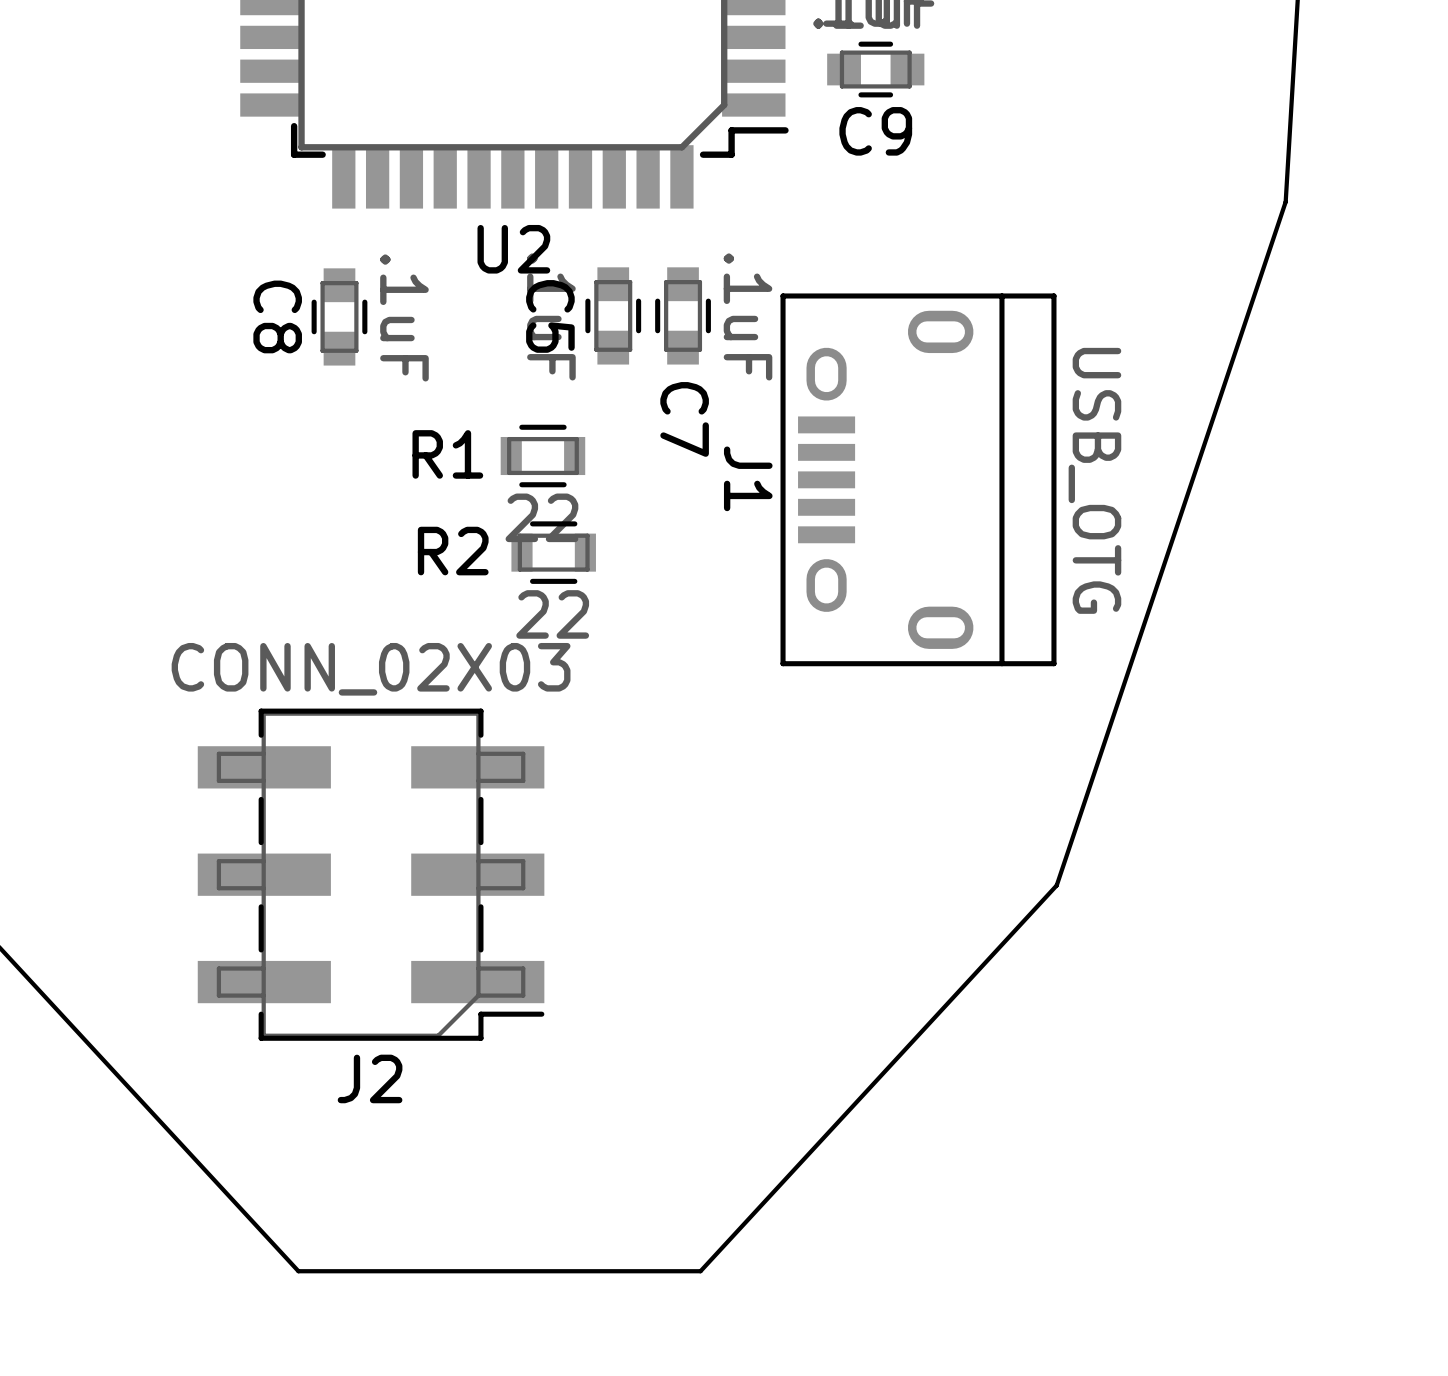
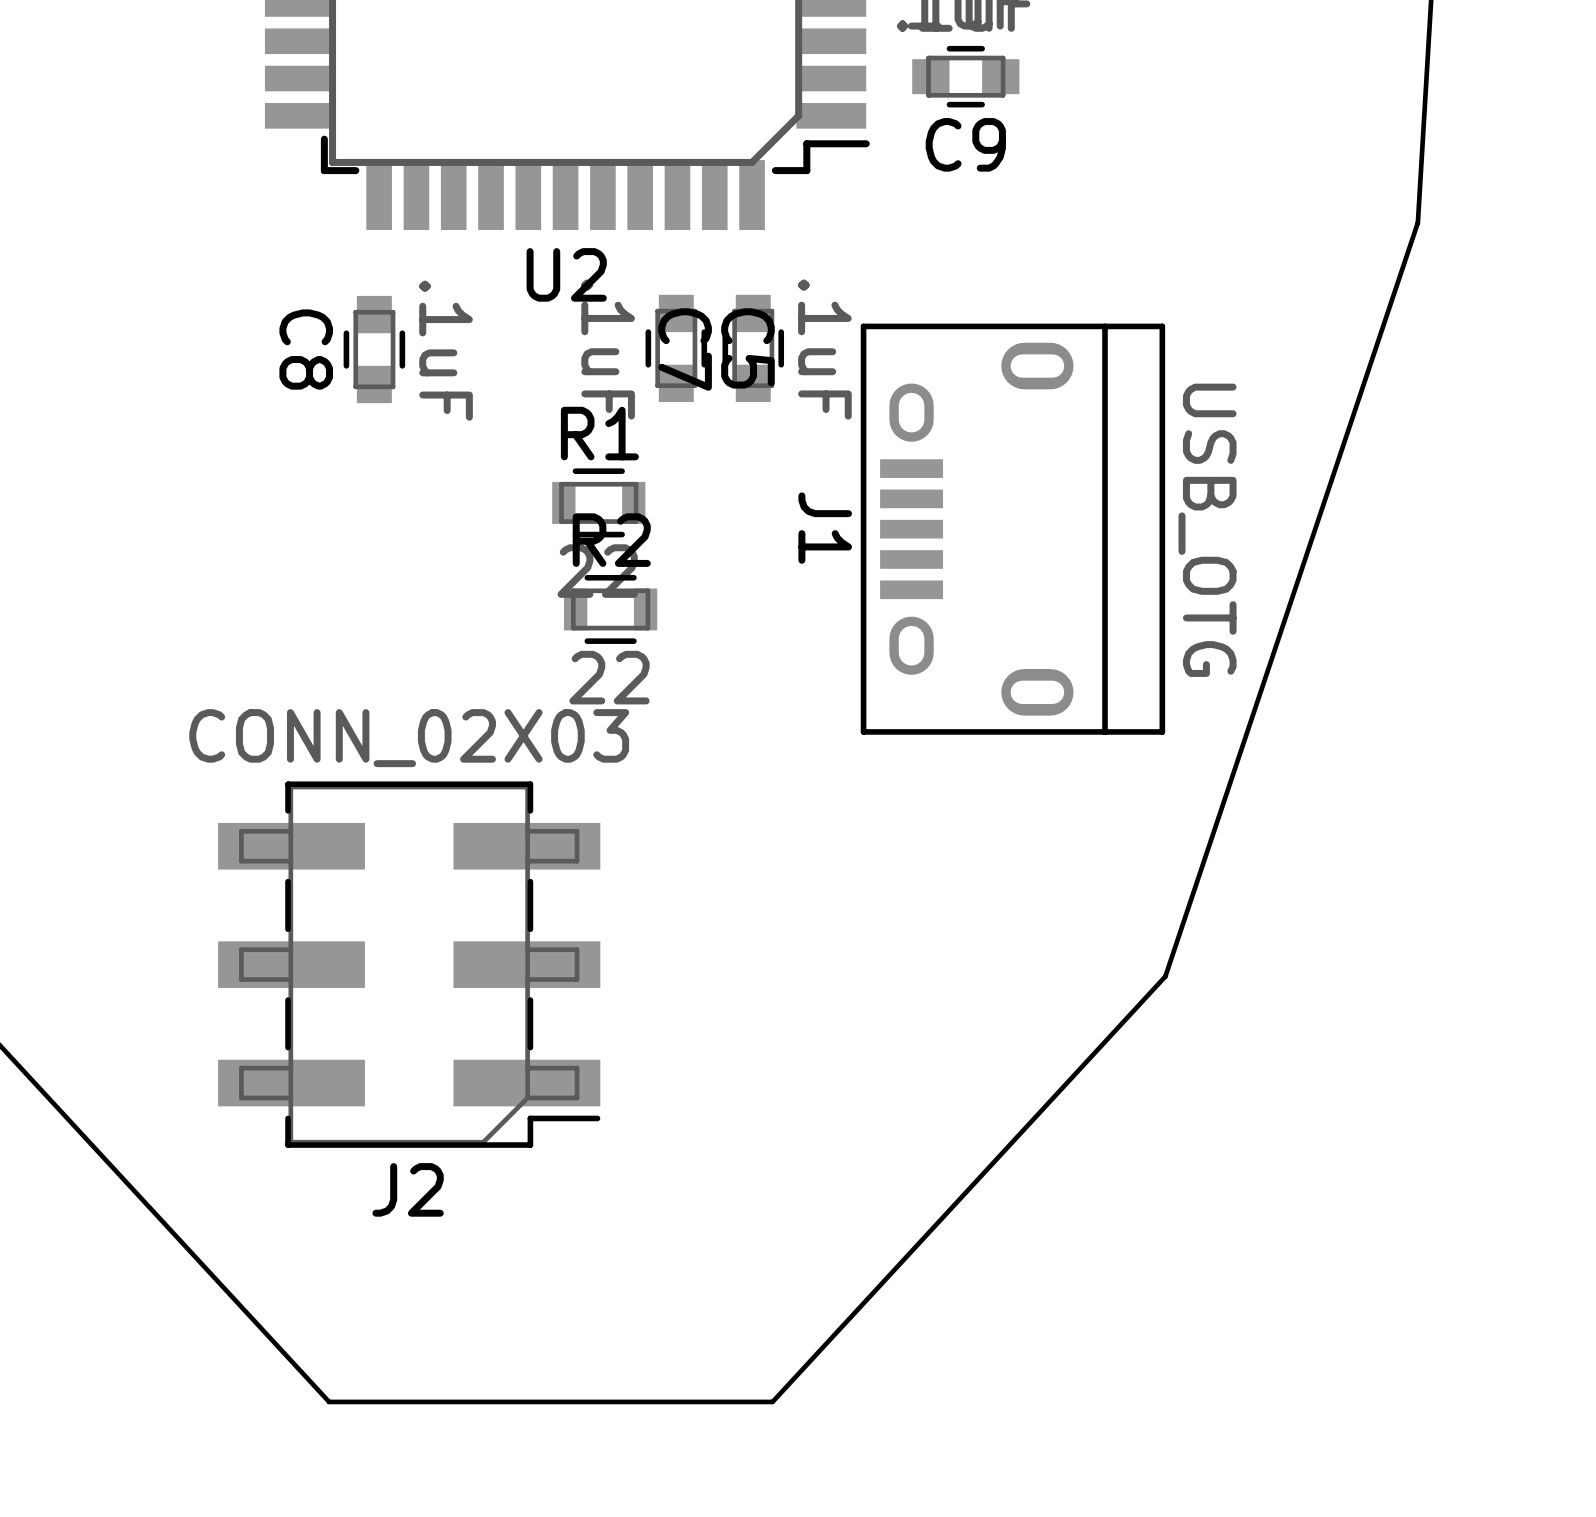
C5 name position: C5 (550, 316) -> C5 (747, 348)
C7 name position: C7 (684, 419) -> C7 (685, 349)
R1 name position: R1 (447, 454) -> R1 (599, 433)
R2 name position: R2 (453, 551) -> R2 (611, 540)

